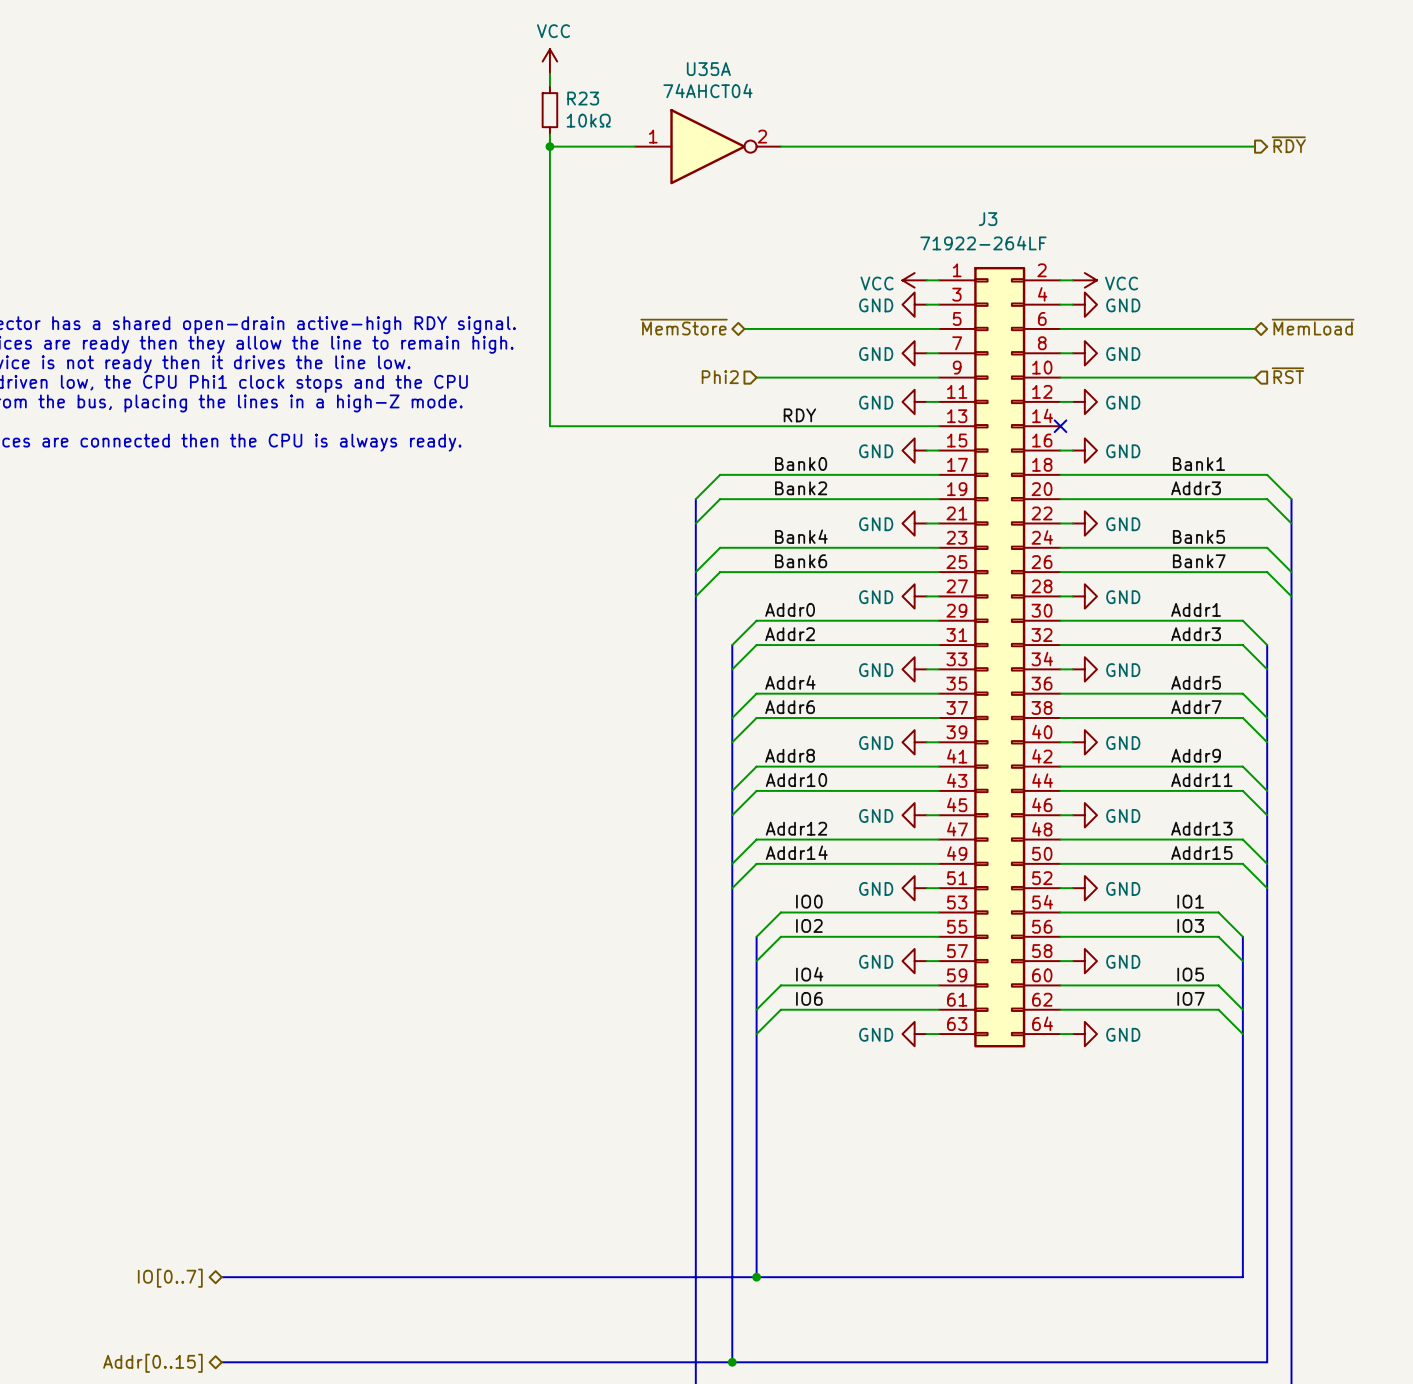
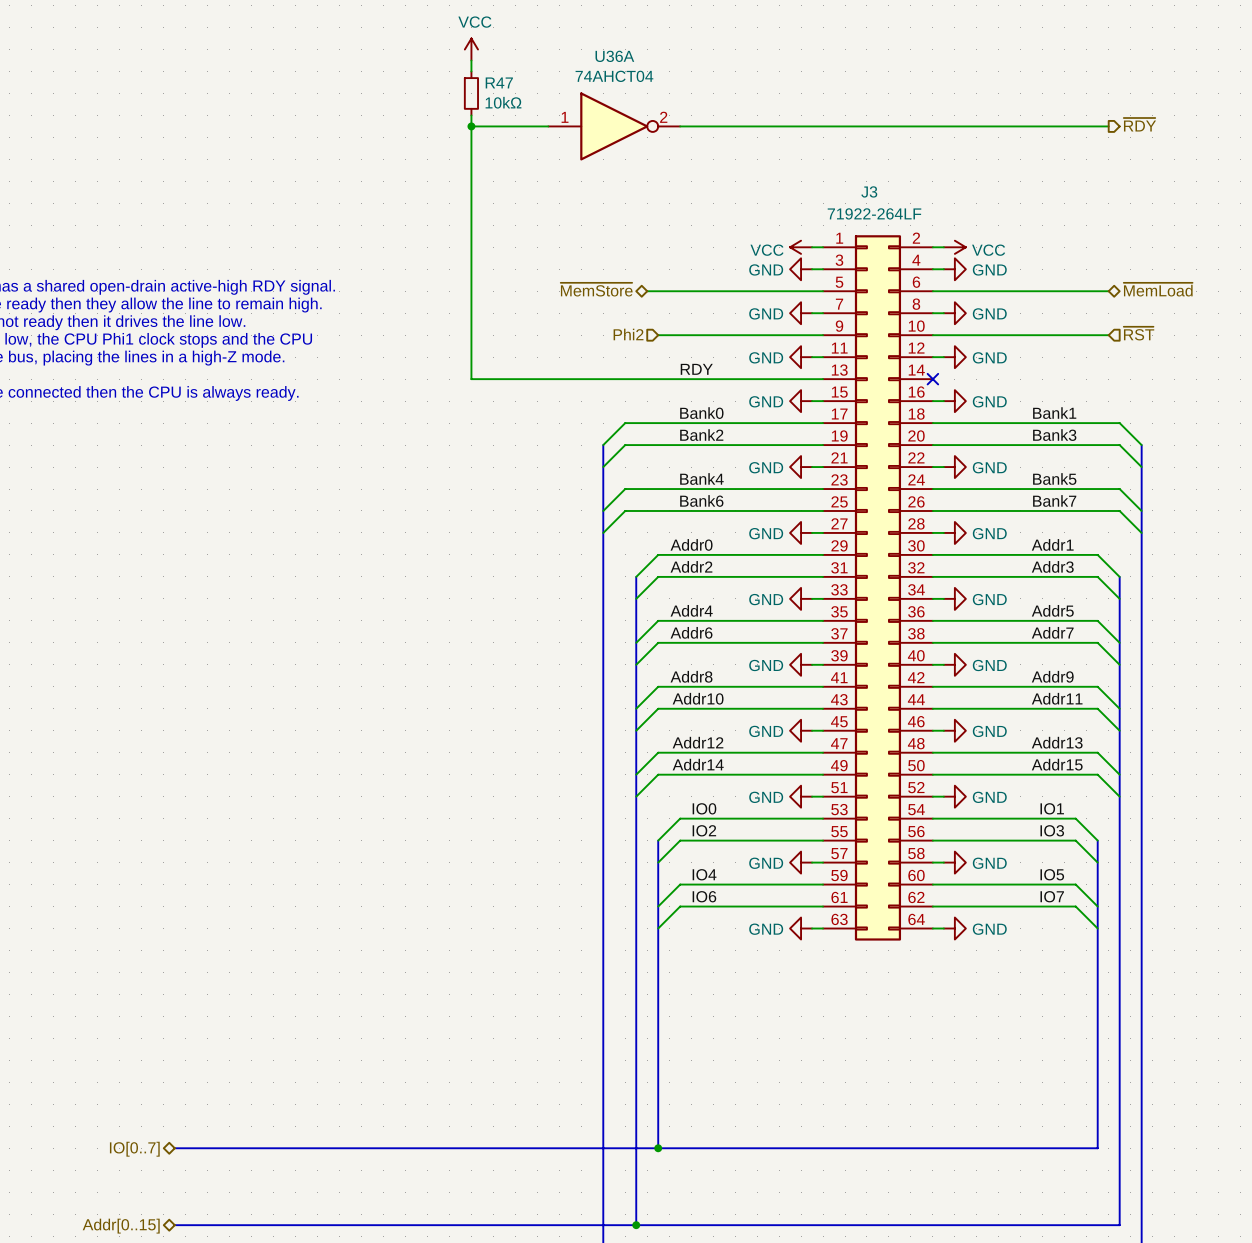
U35A name: U35A (708, 69) -> U36A (614, 56)
R23 name: R23 (583, 98) -> R47 (499, 82)
label: Addr3 (1196, 488) -> Bank3 (1054, 435)

